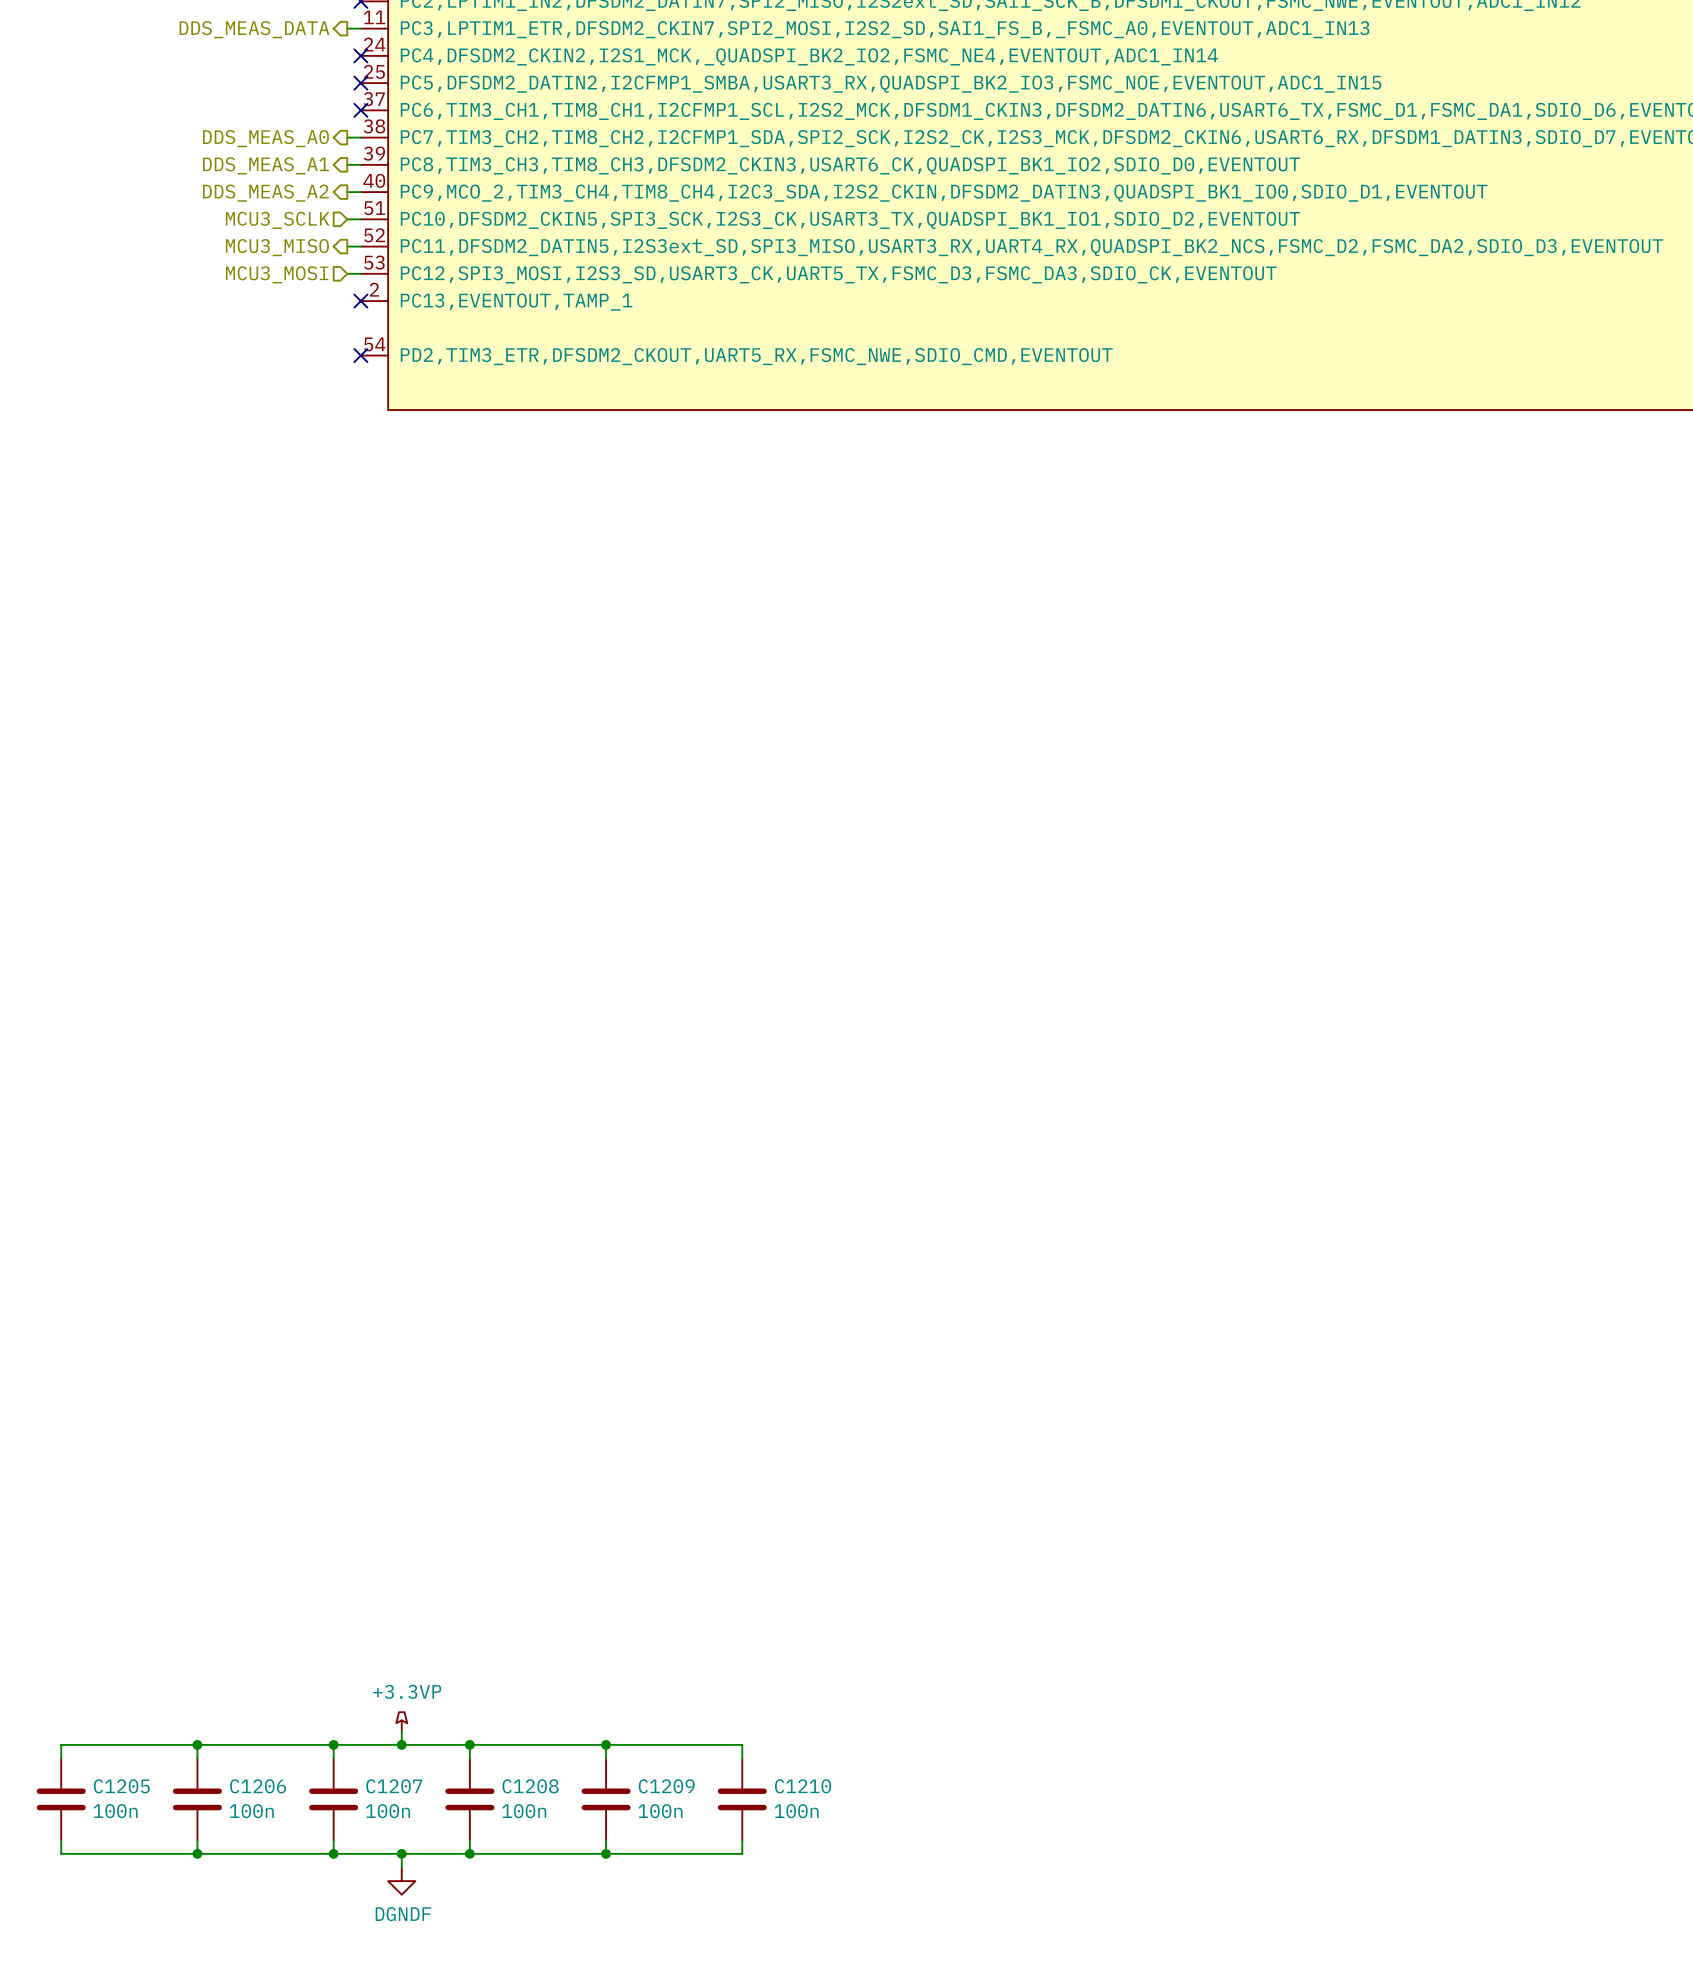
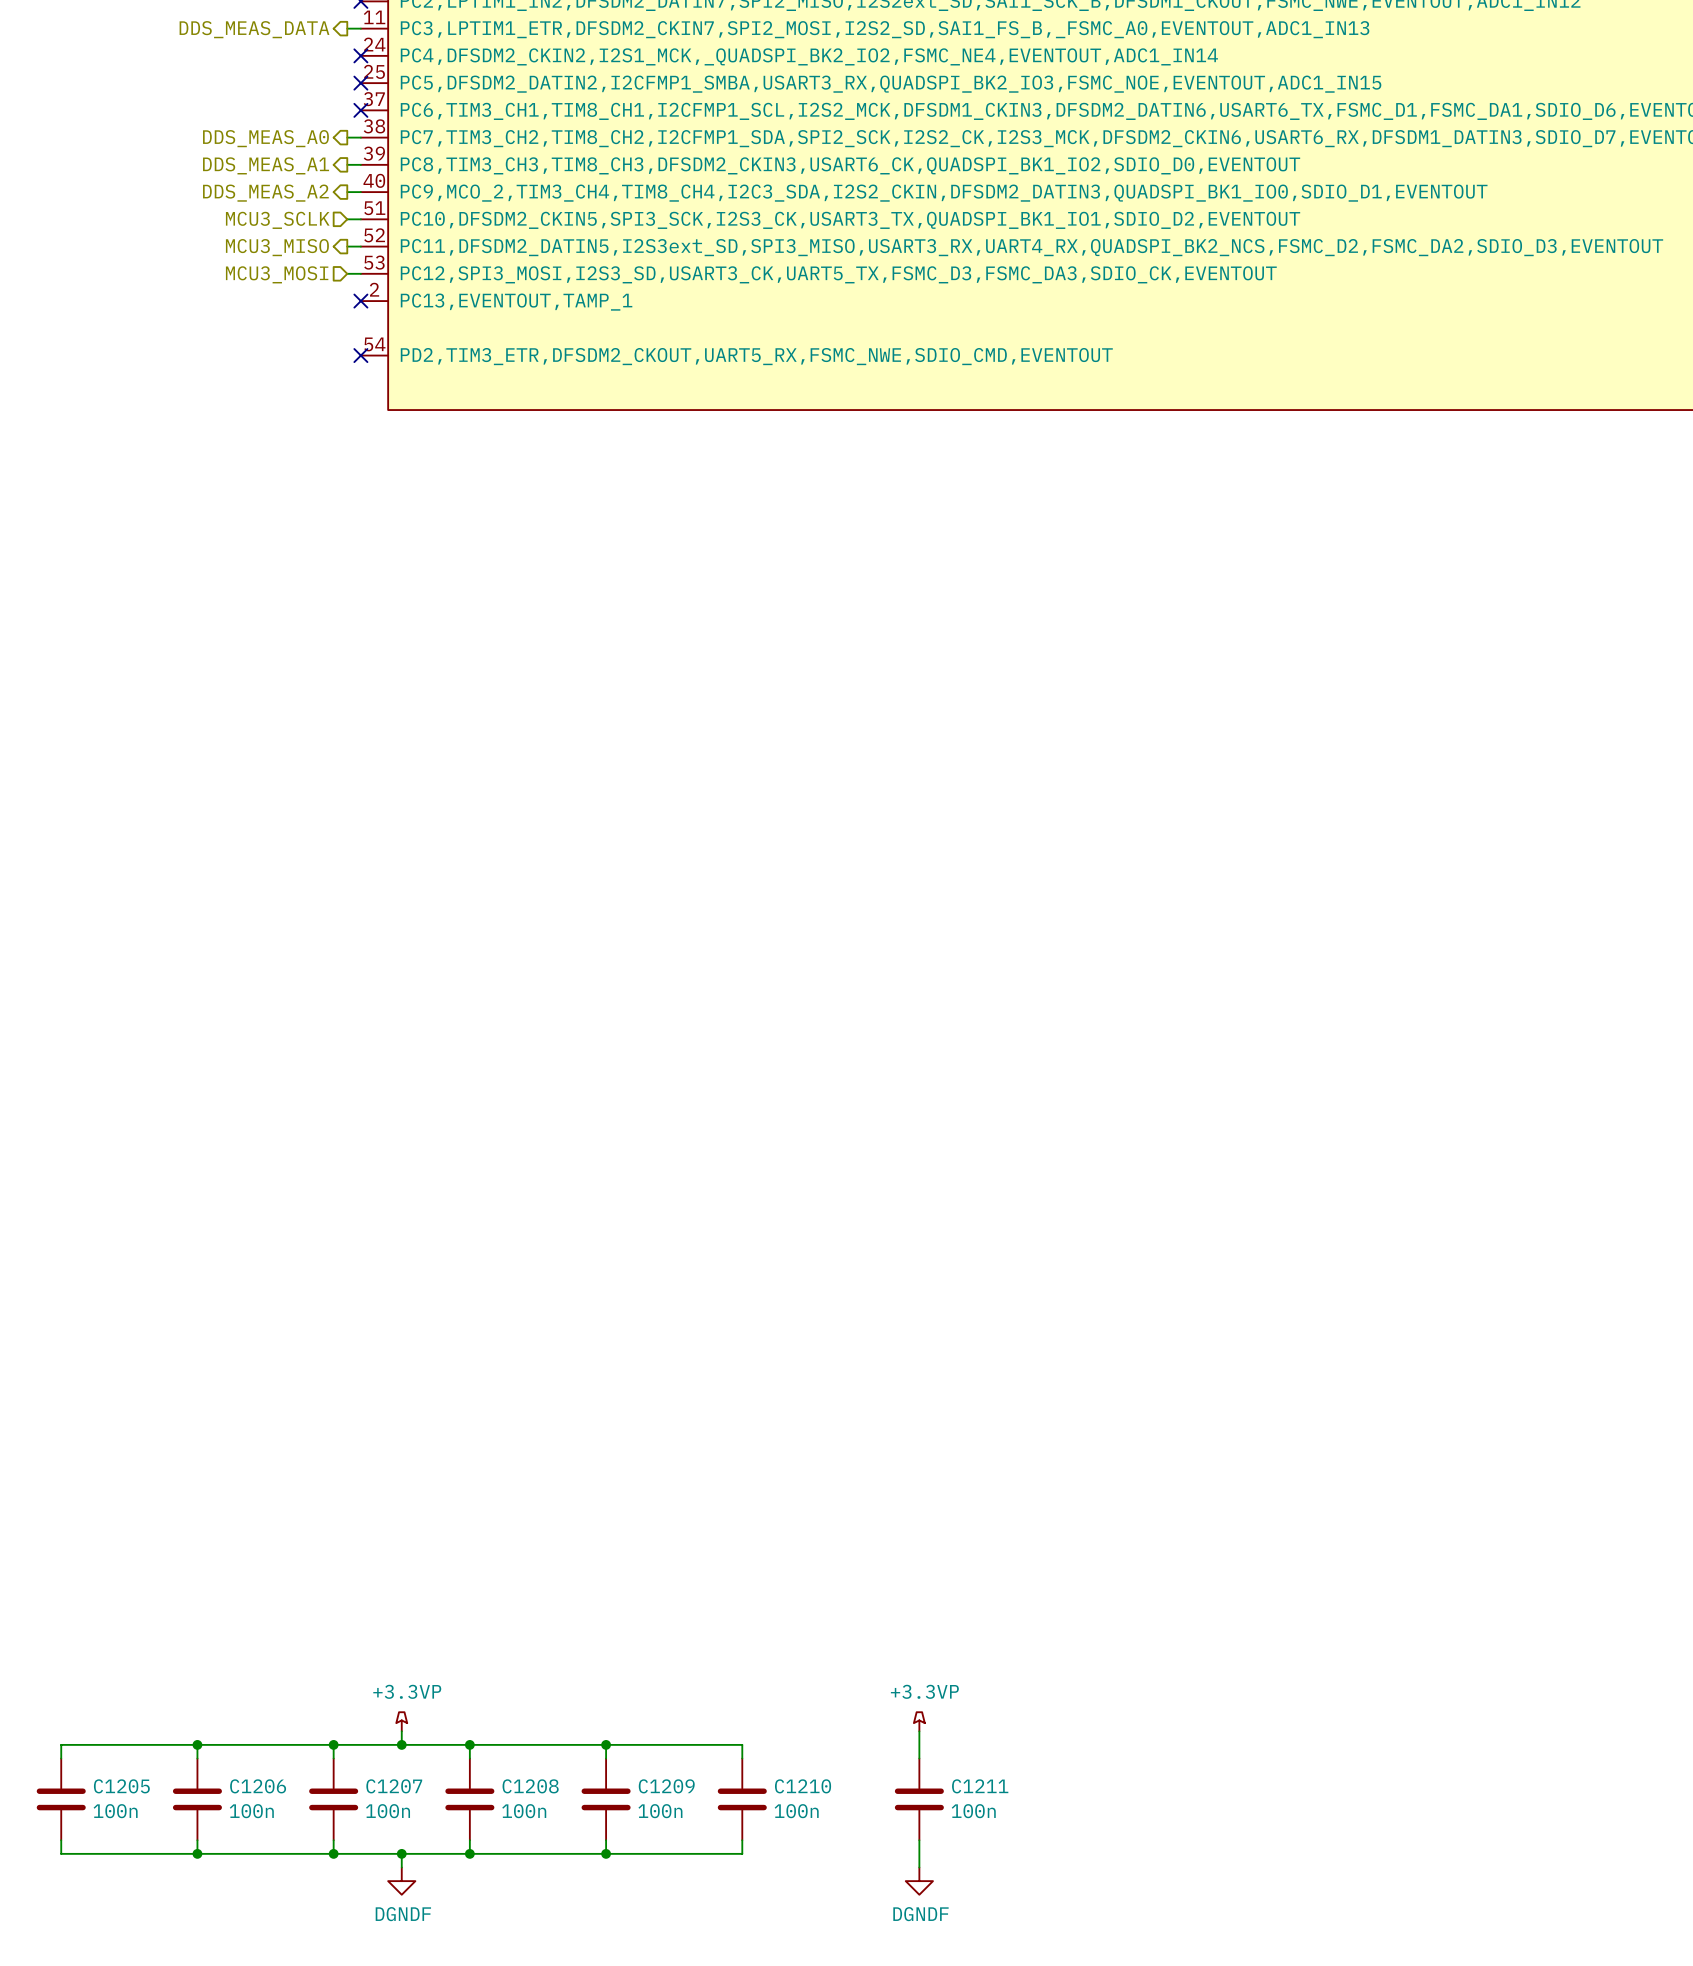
power symbol: none -> +3.3VP (919, 1721)
wire: none -> (919, 1731) (919, 1758)
C1211: none -> 100n (919, 1799)
wire: none -> (919, 1840) (919, 1867)
power symbol: none -> DGNDF (919, 1881)

